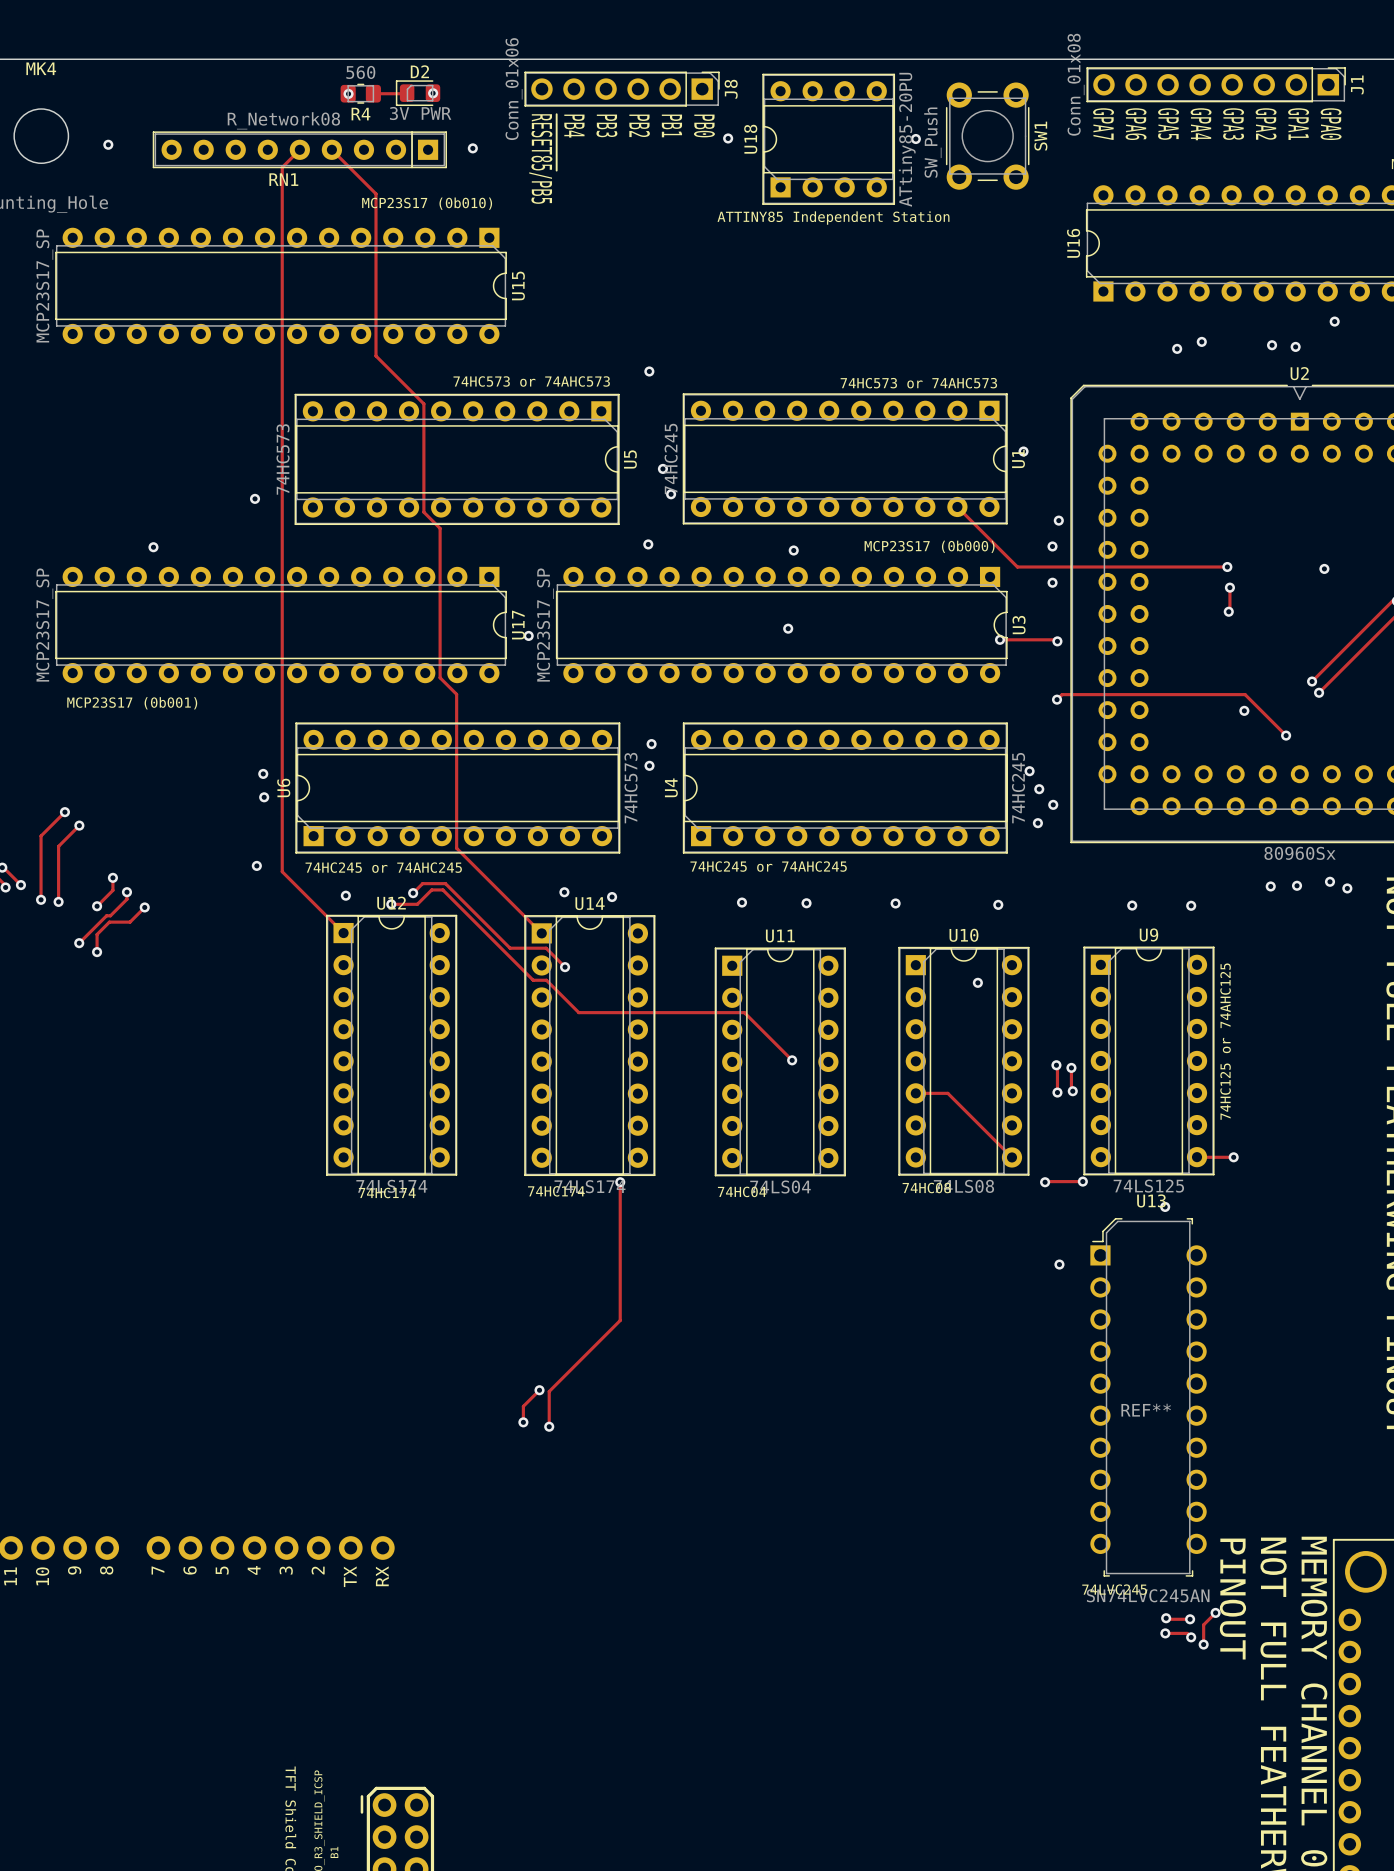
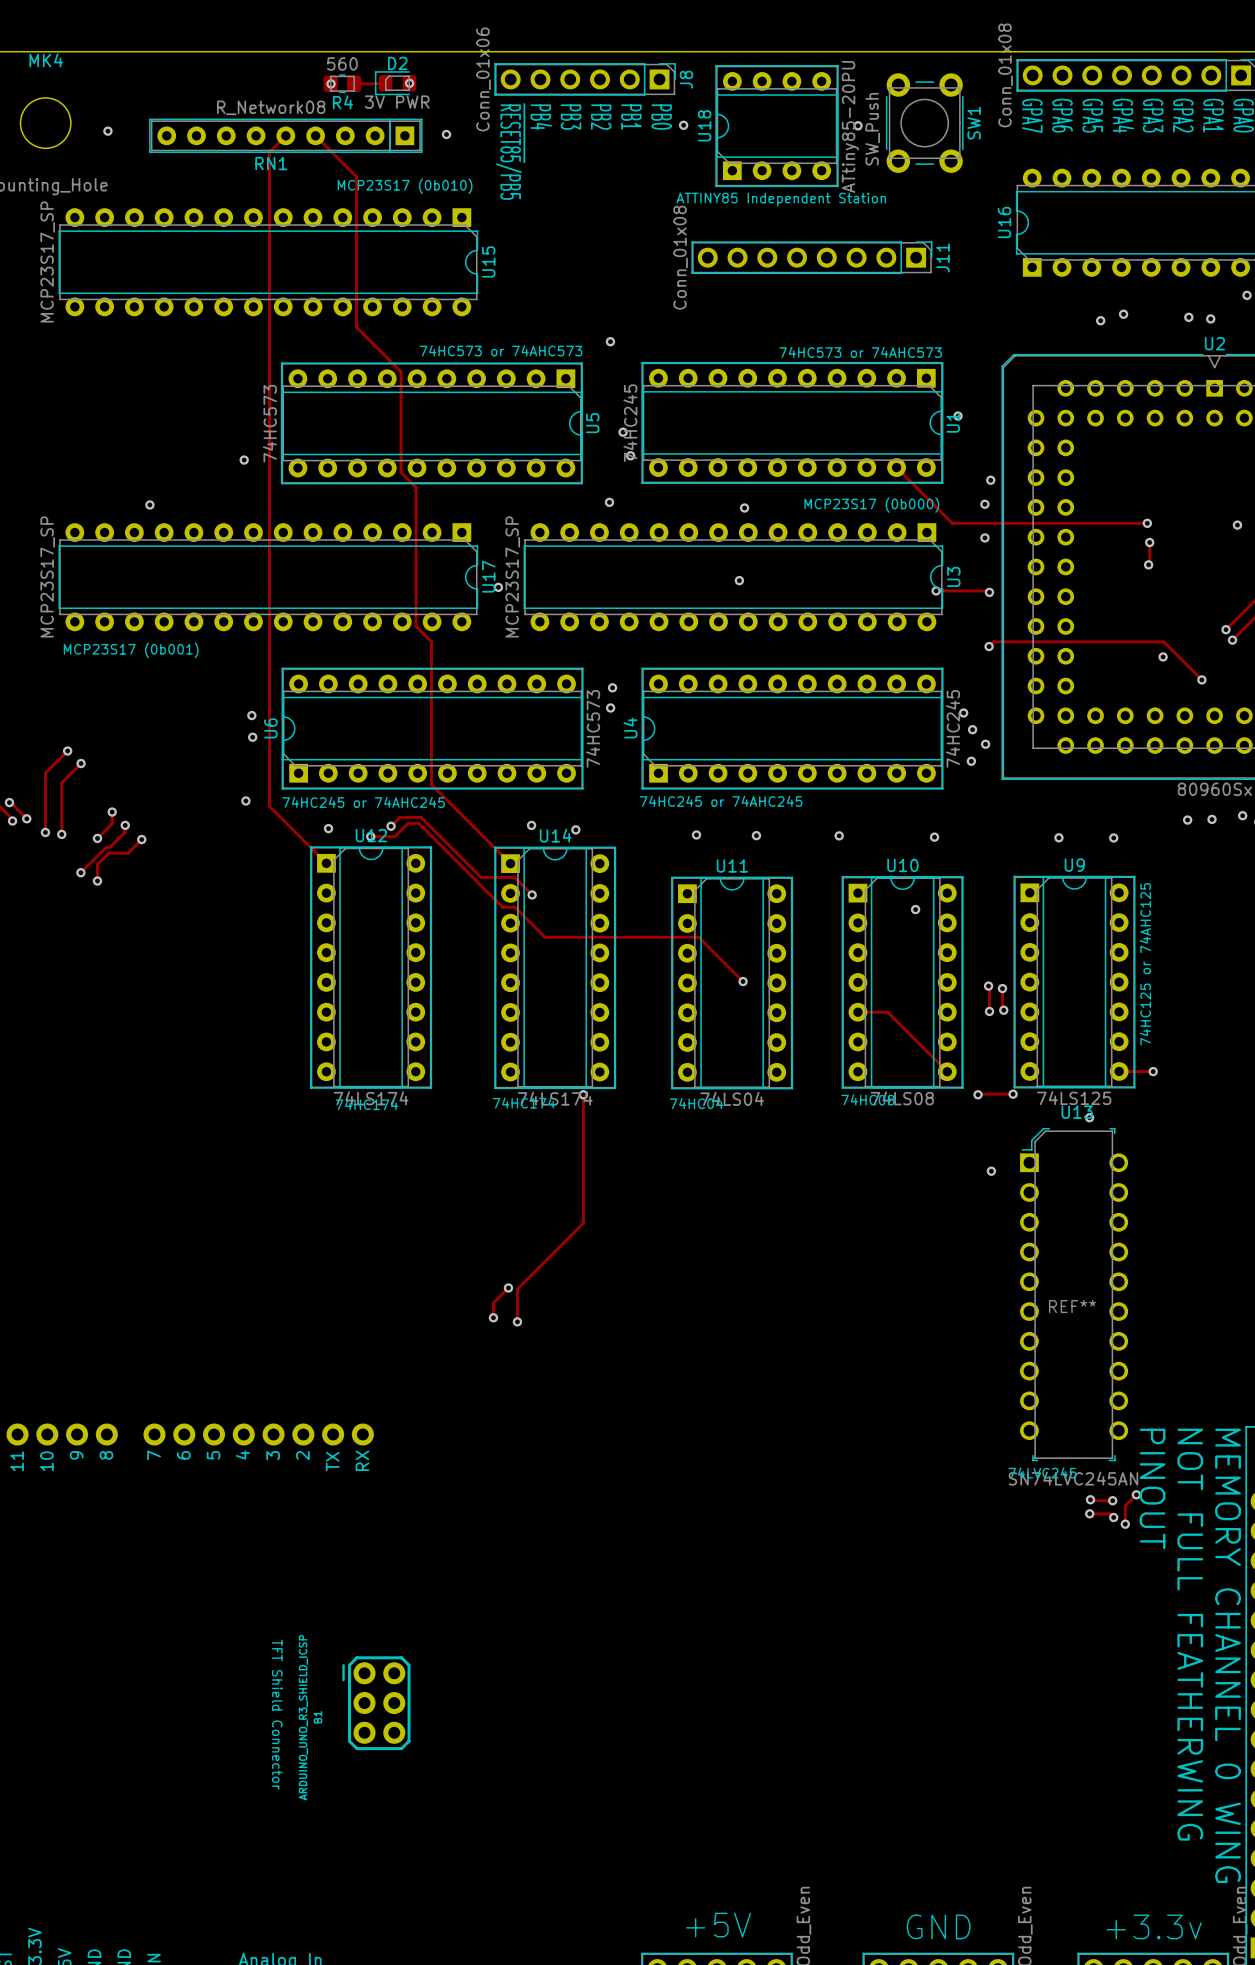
J11: none -> Conn_01x08 (811, 257)

